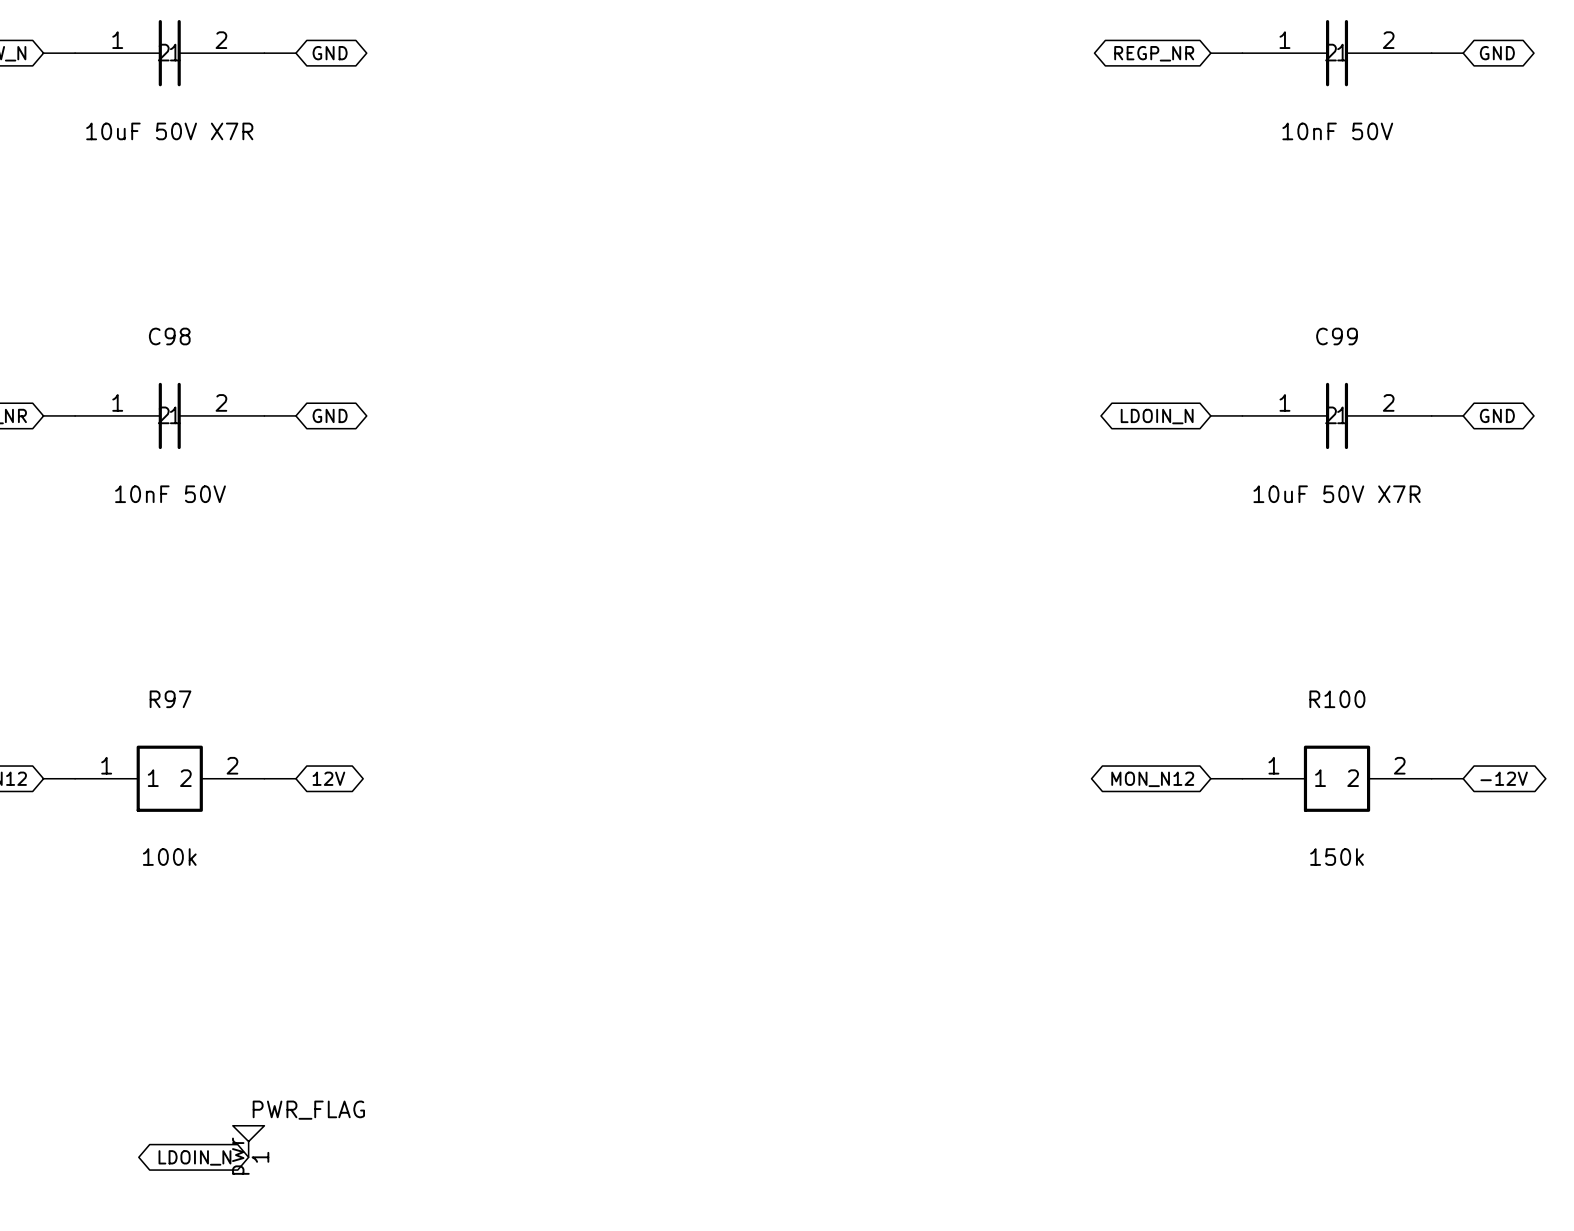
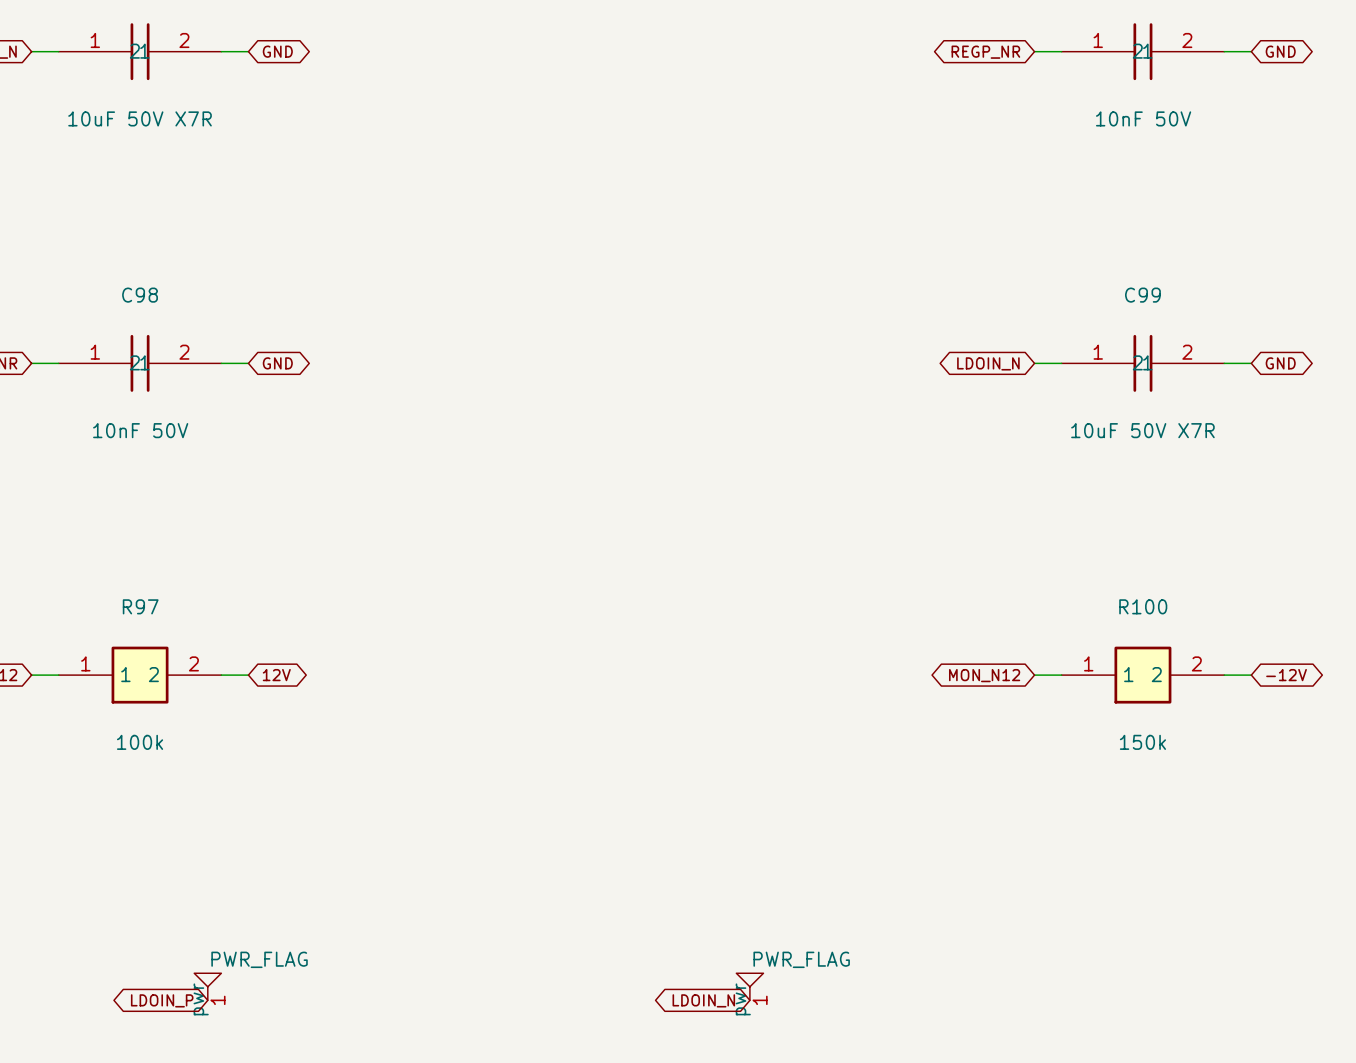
power symbol: none -> PWR_FLAG (749, 986)
global label: LDOIN_N (194, 1157) -> LDOIN_P (162, 1000)
global label: none -> LDOIN_N (703, 1000)

